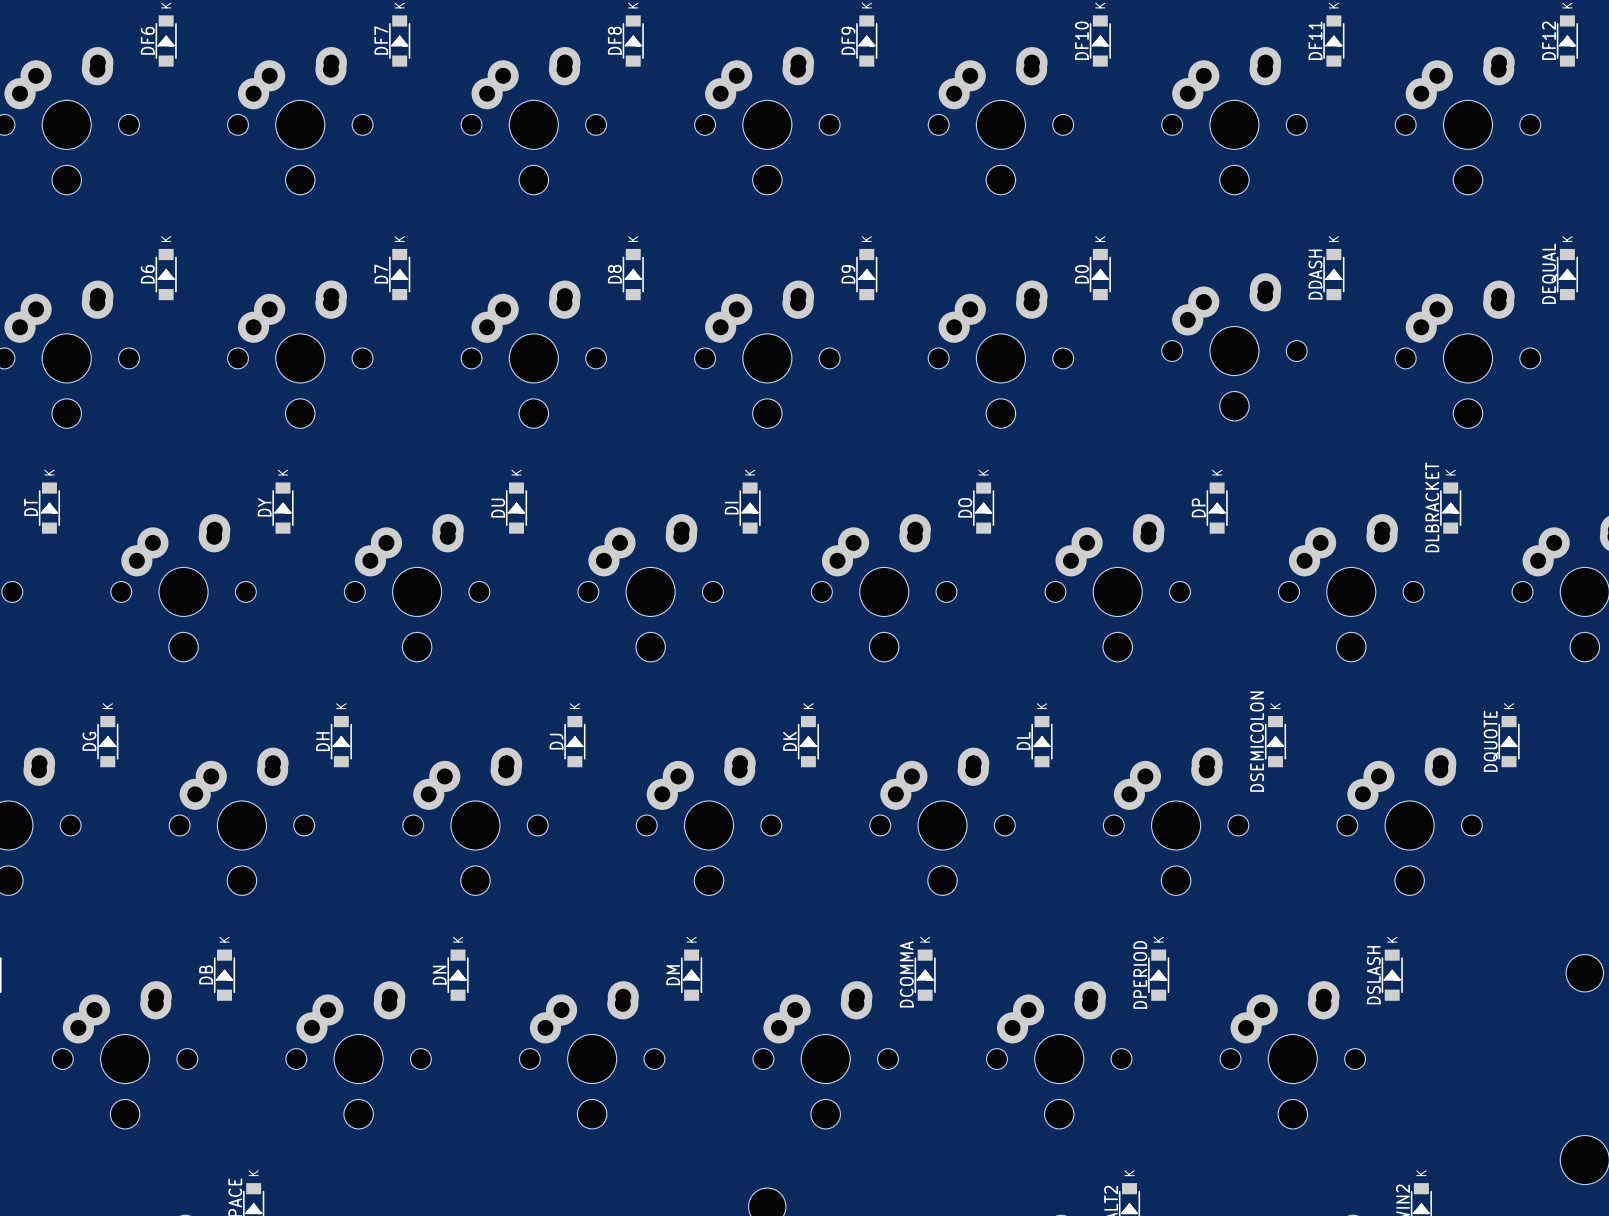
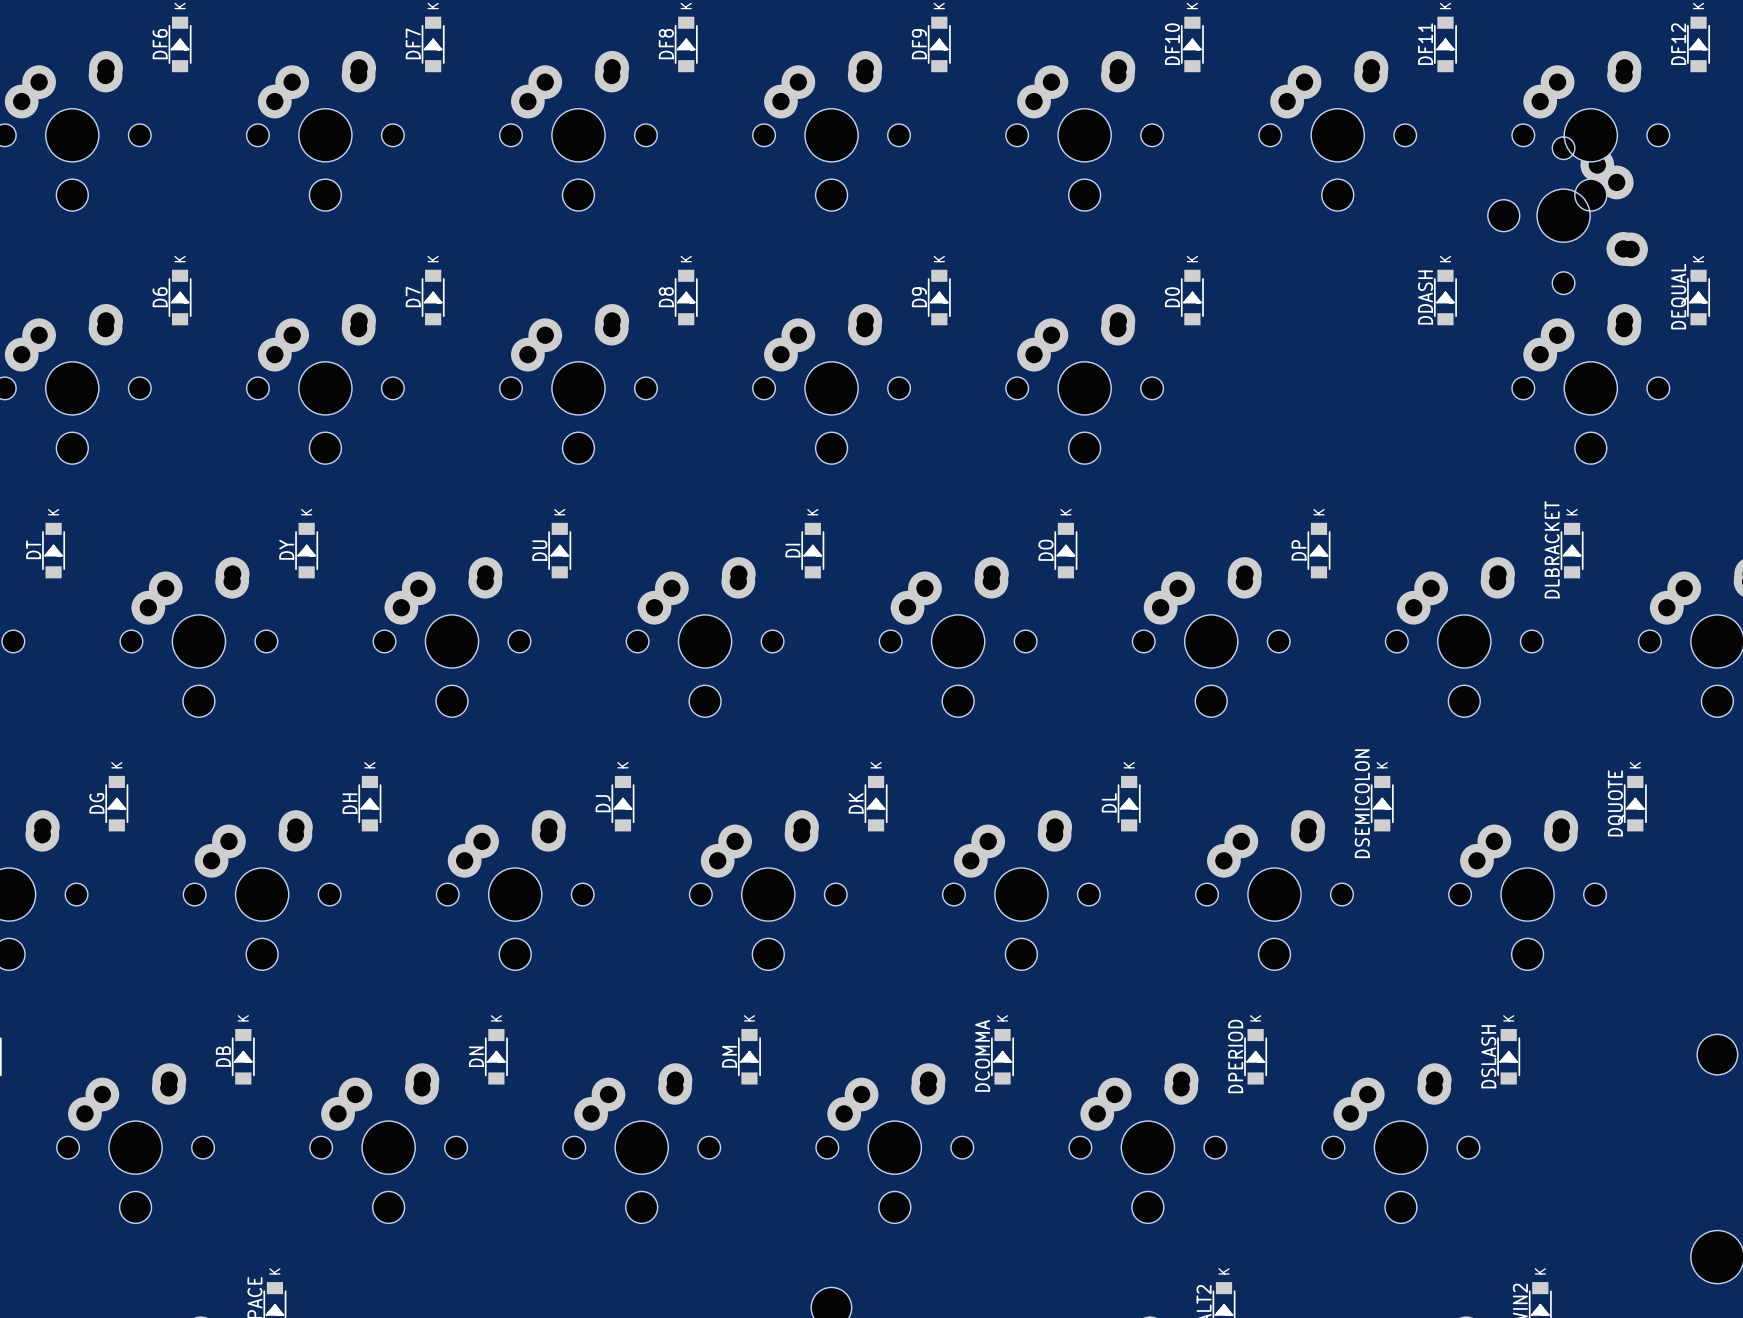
part rotation: 0° (1234, 347) -> 90° clockwise (1567, 215)
part position: (1234, 347) -> (1567, 215)

